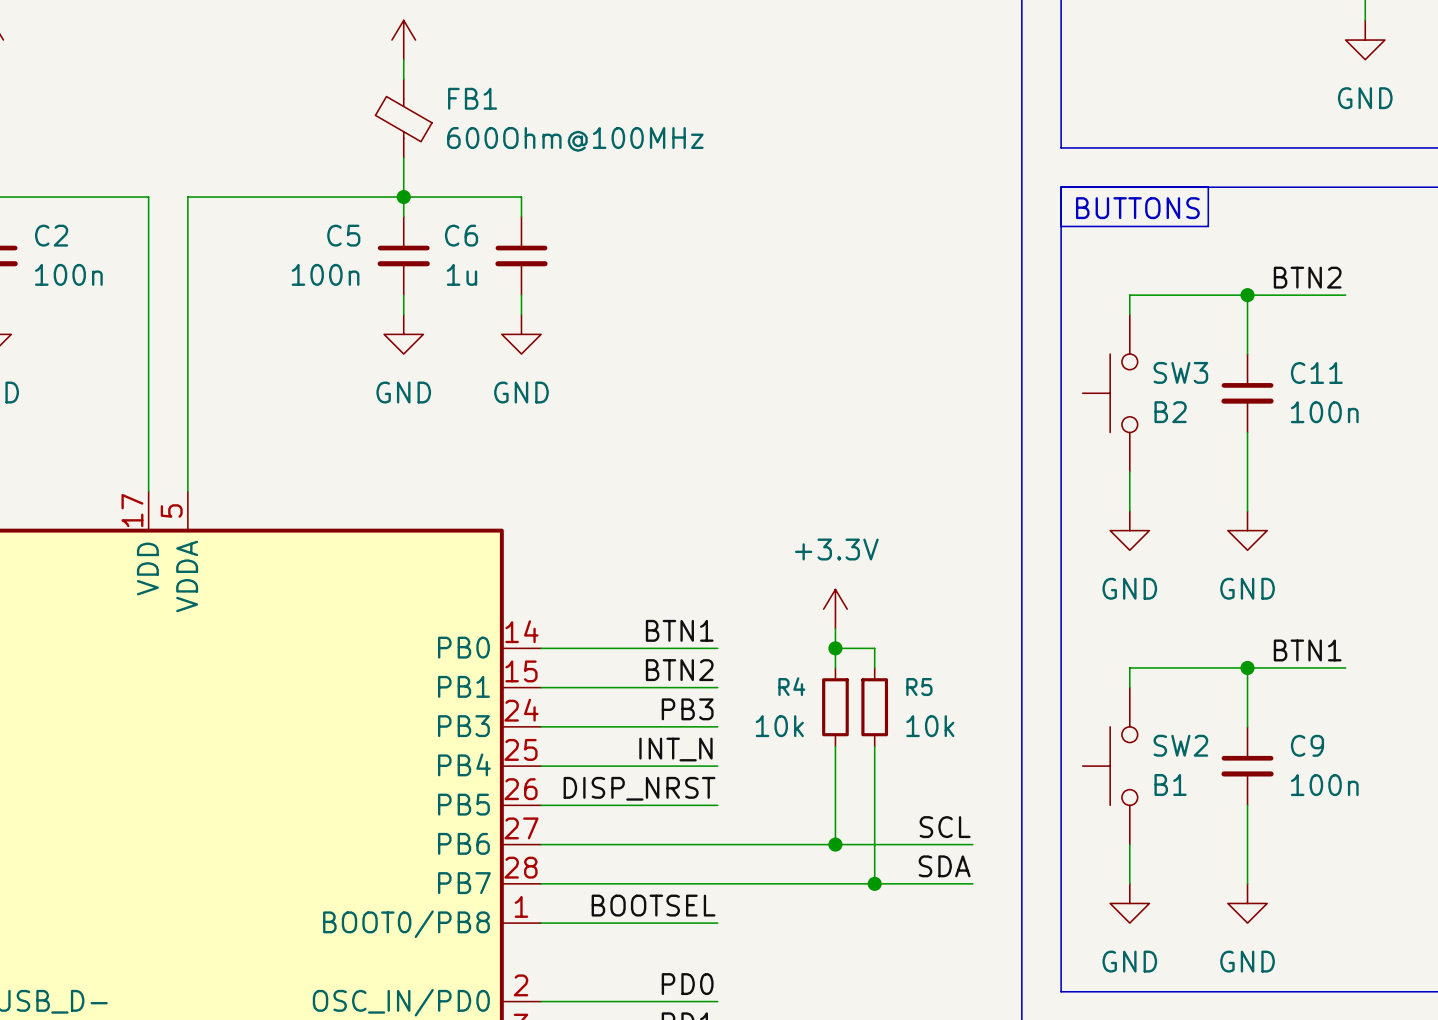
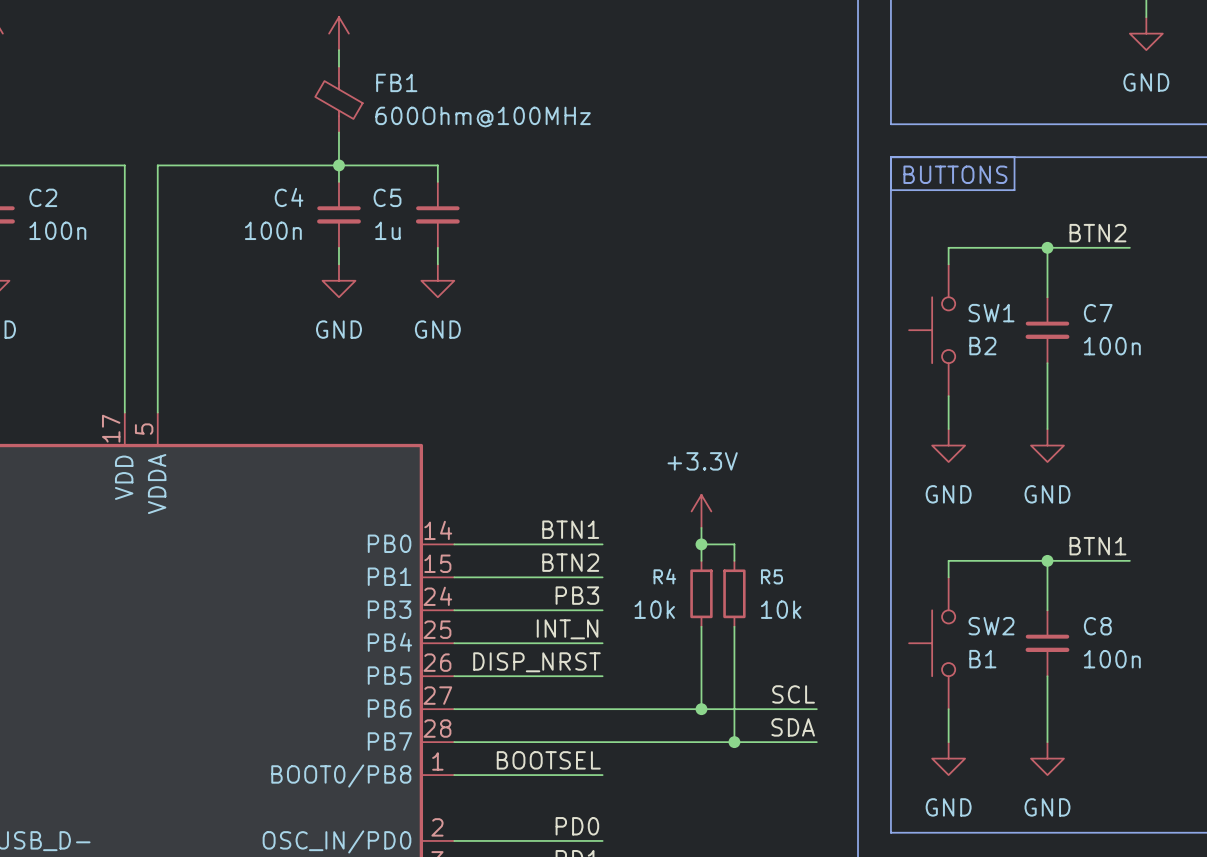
C5 name: C5 (343, 235) -> C4 (289, 197)
C6 name: C6 (461, 235) -> C5 (387, 197)
SW3 name: SW3 (1180, 372) -> SW1 (991, 313)
C11 name: C11 (1316, 373) -> C7 (1098, 313)
C9 name: C9 (1307, 745) -> C8 (1097, 626)

